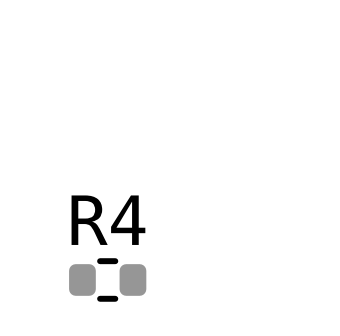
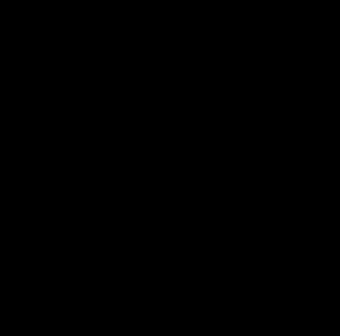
R4: (107, 279) -> none

